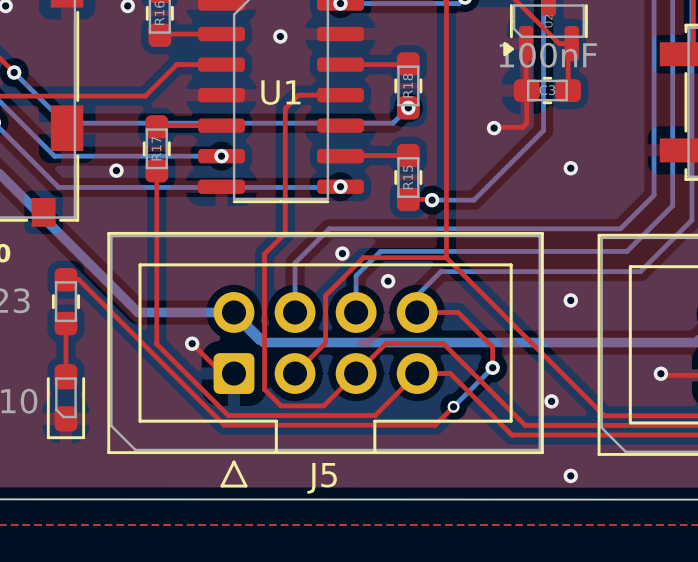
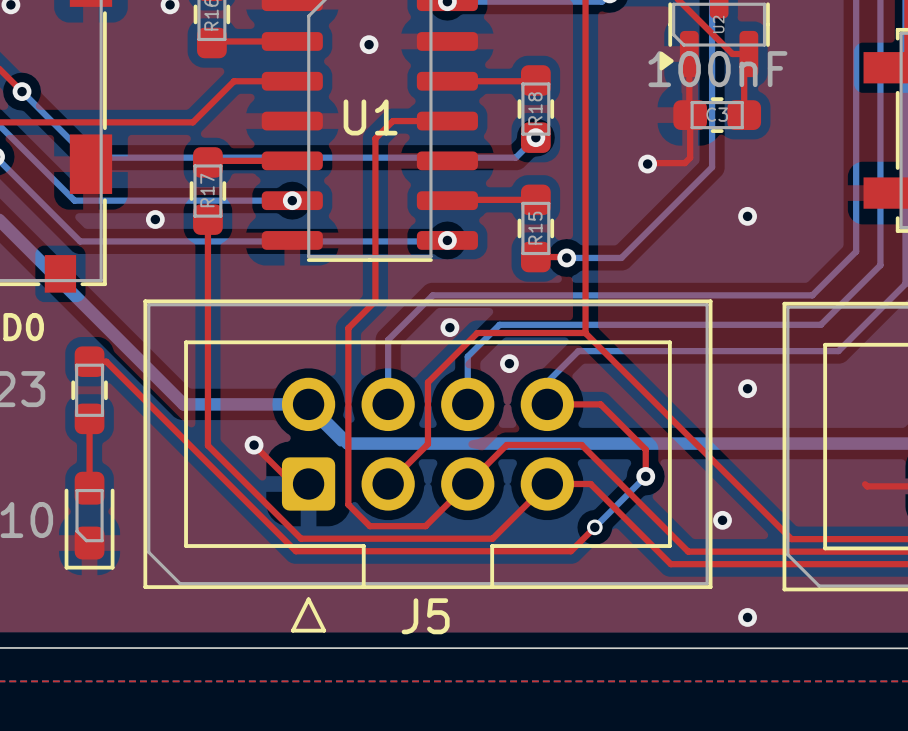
via: (660, 373) -> none

